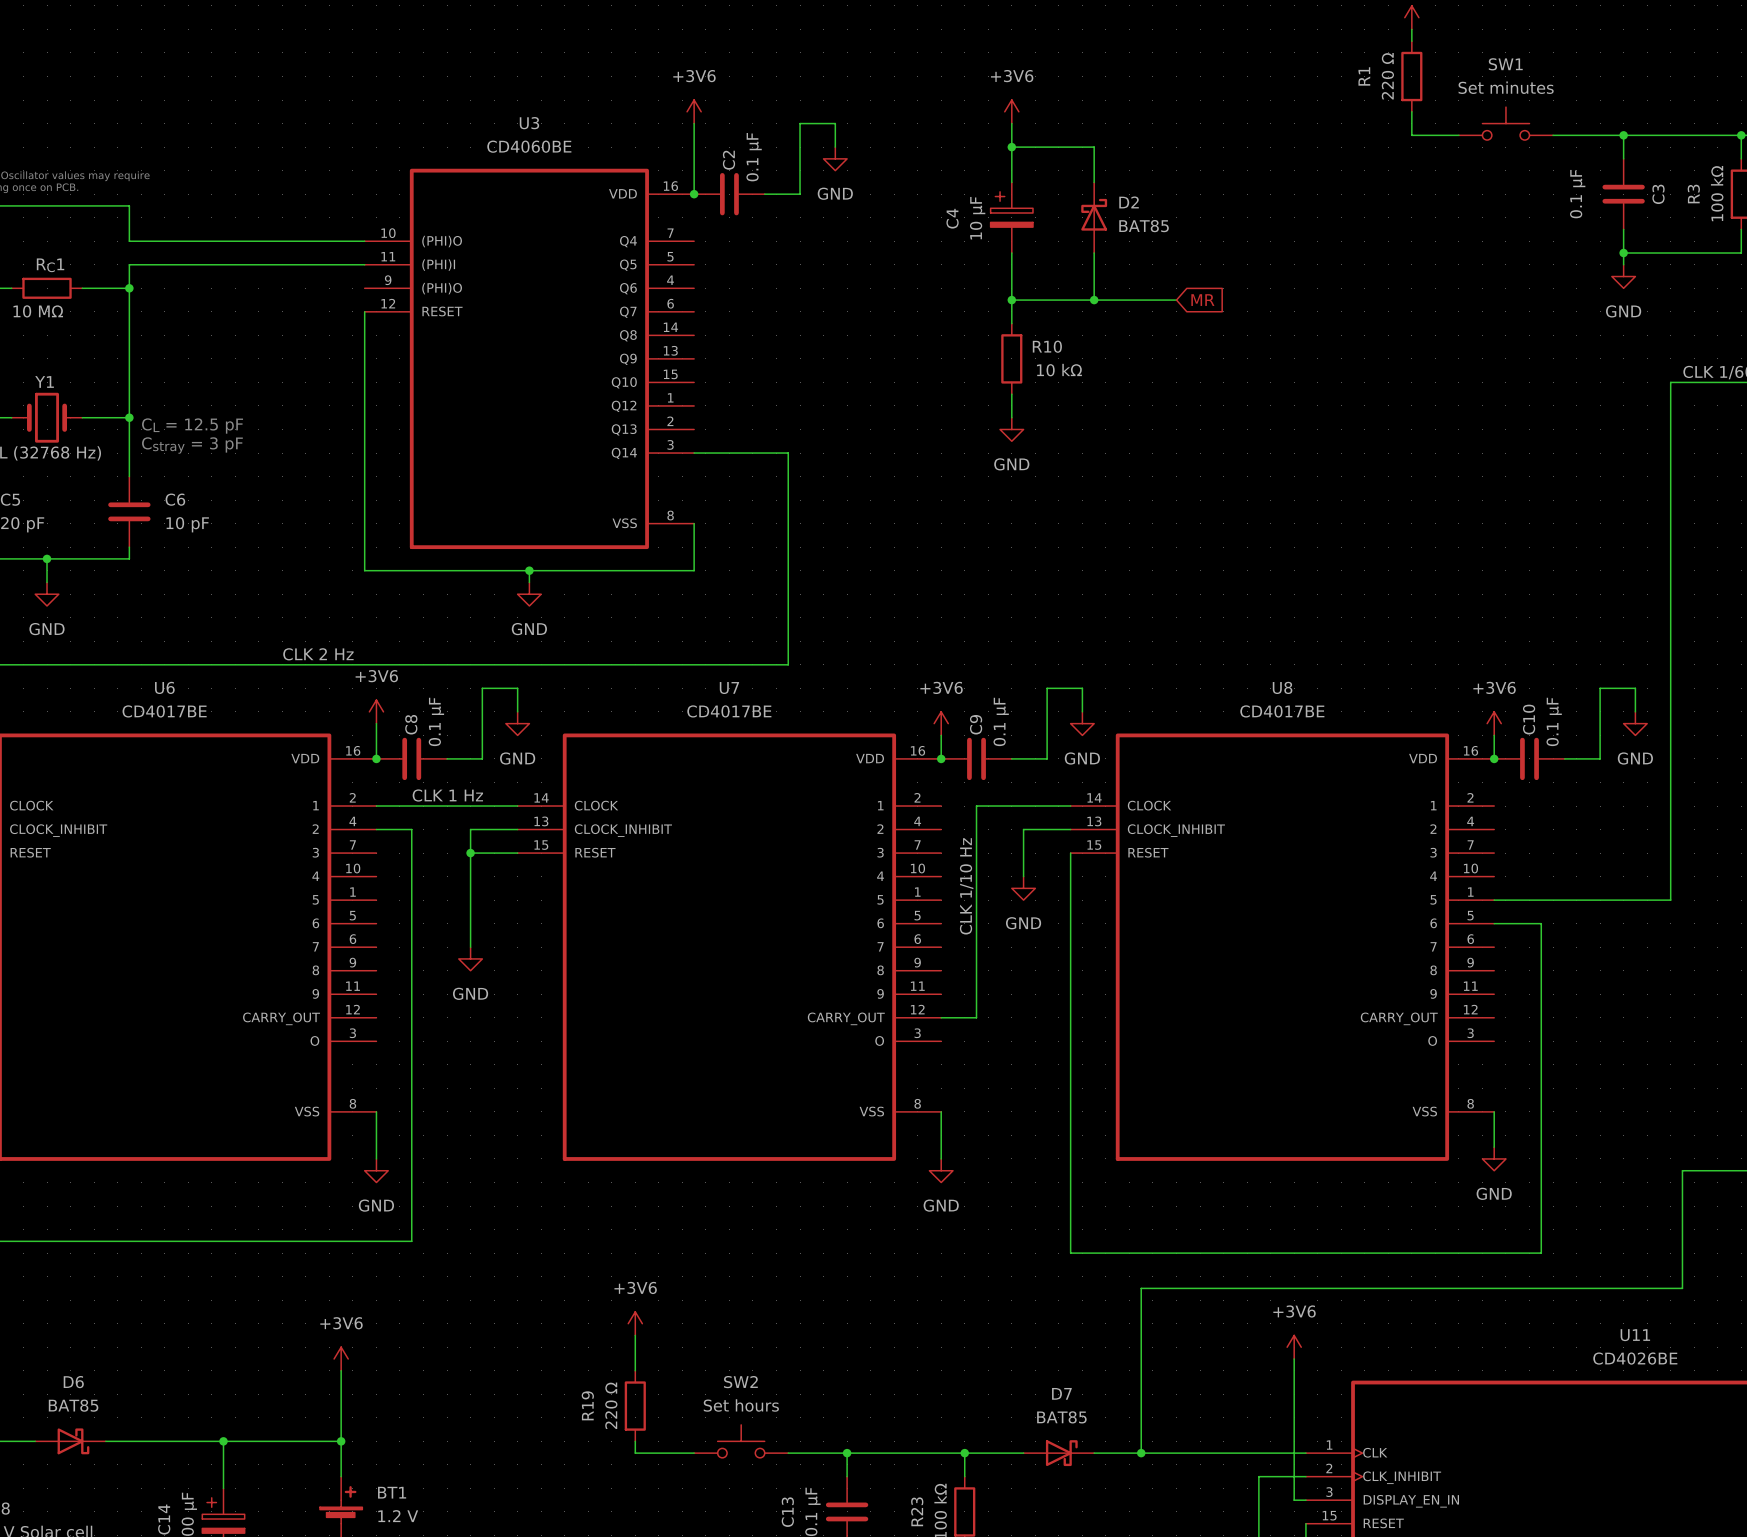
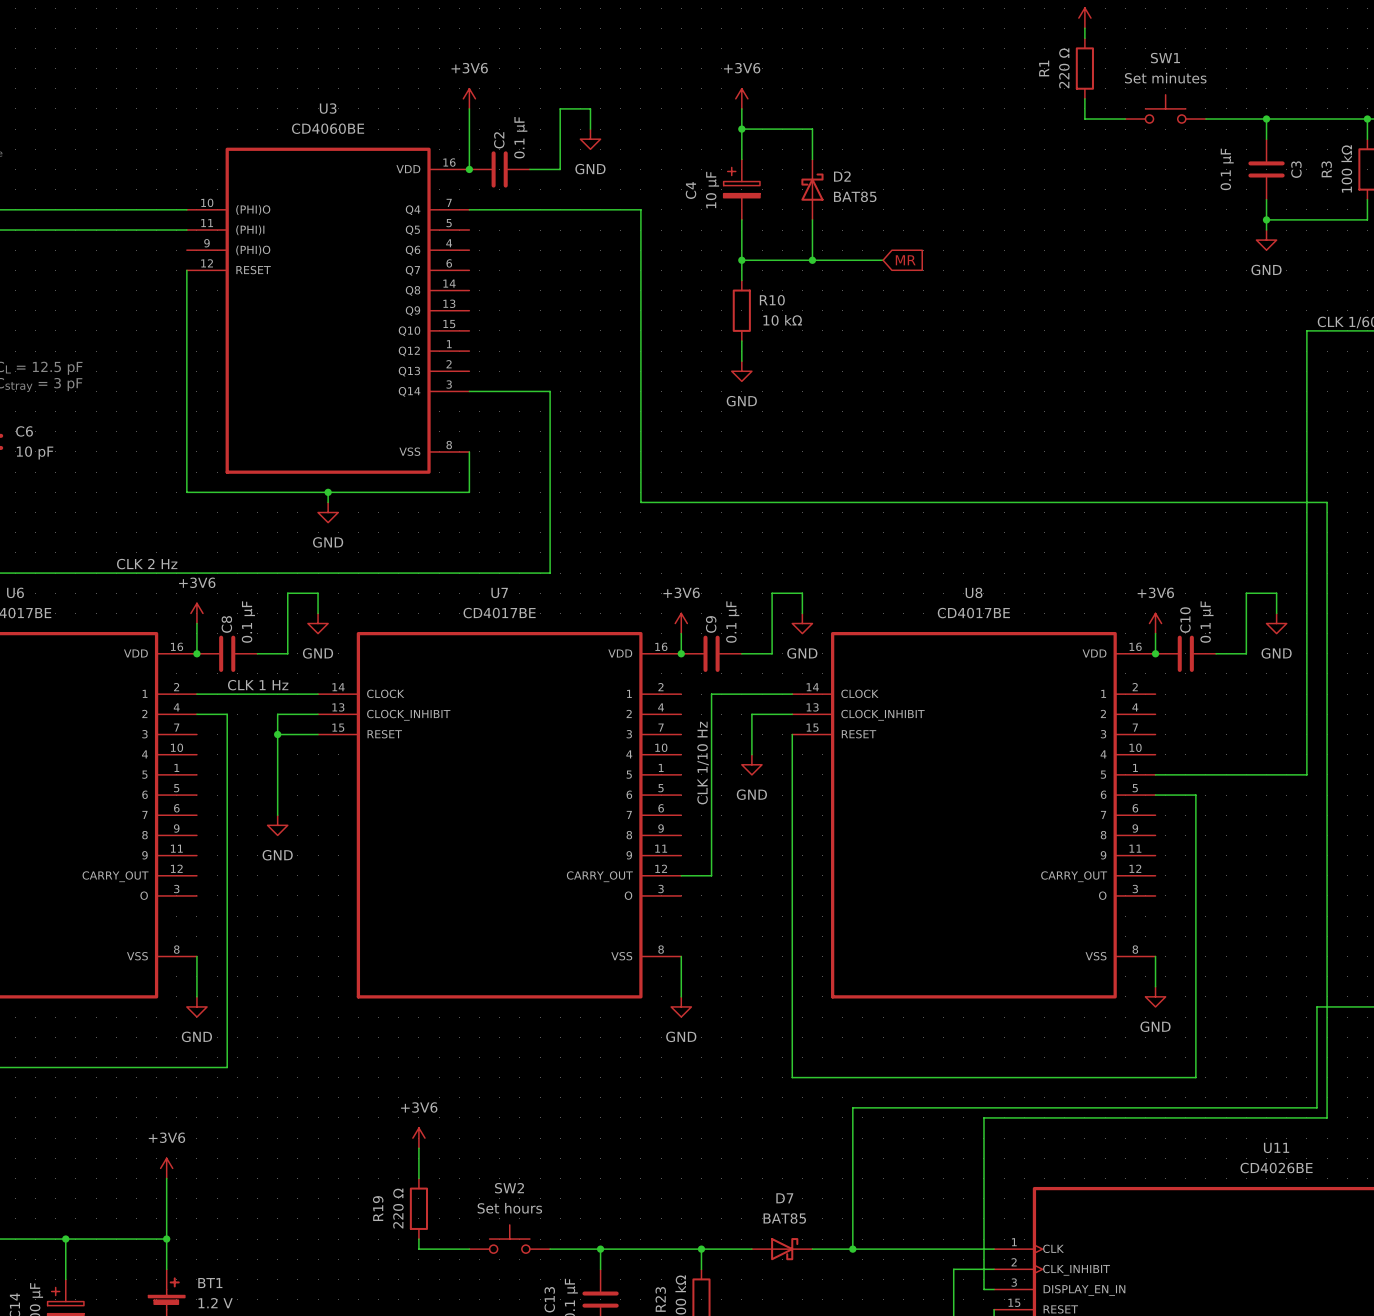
wire: none -> (469, 209) (640, 209) (640, 502) (1327, 502) (1327, 1117) (983, 1117) (983, 1168)
power symbol: +3V6 (1294, 1347) -> none

